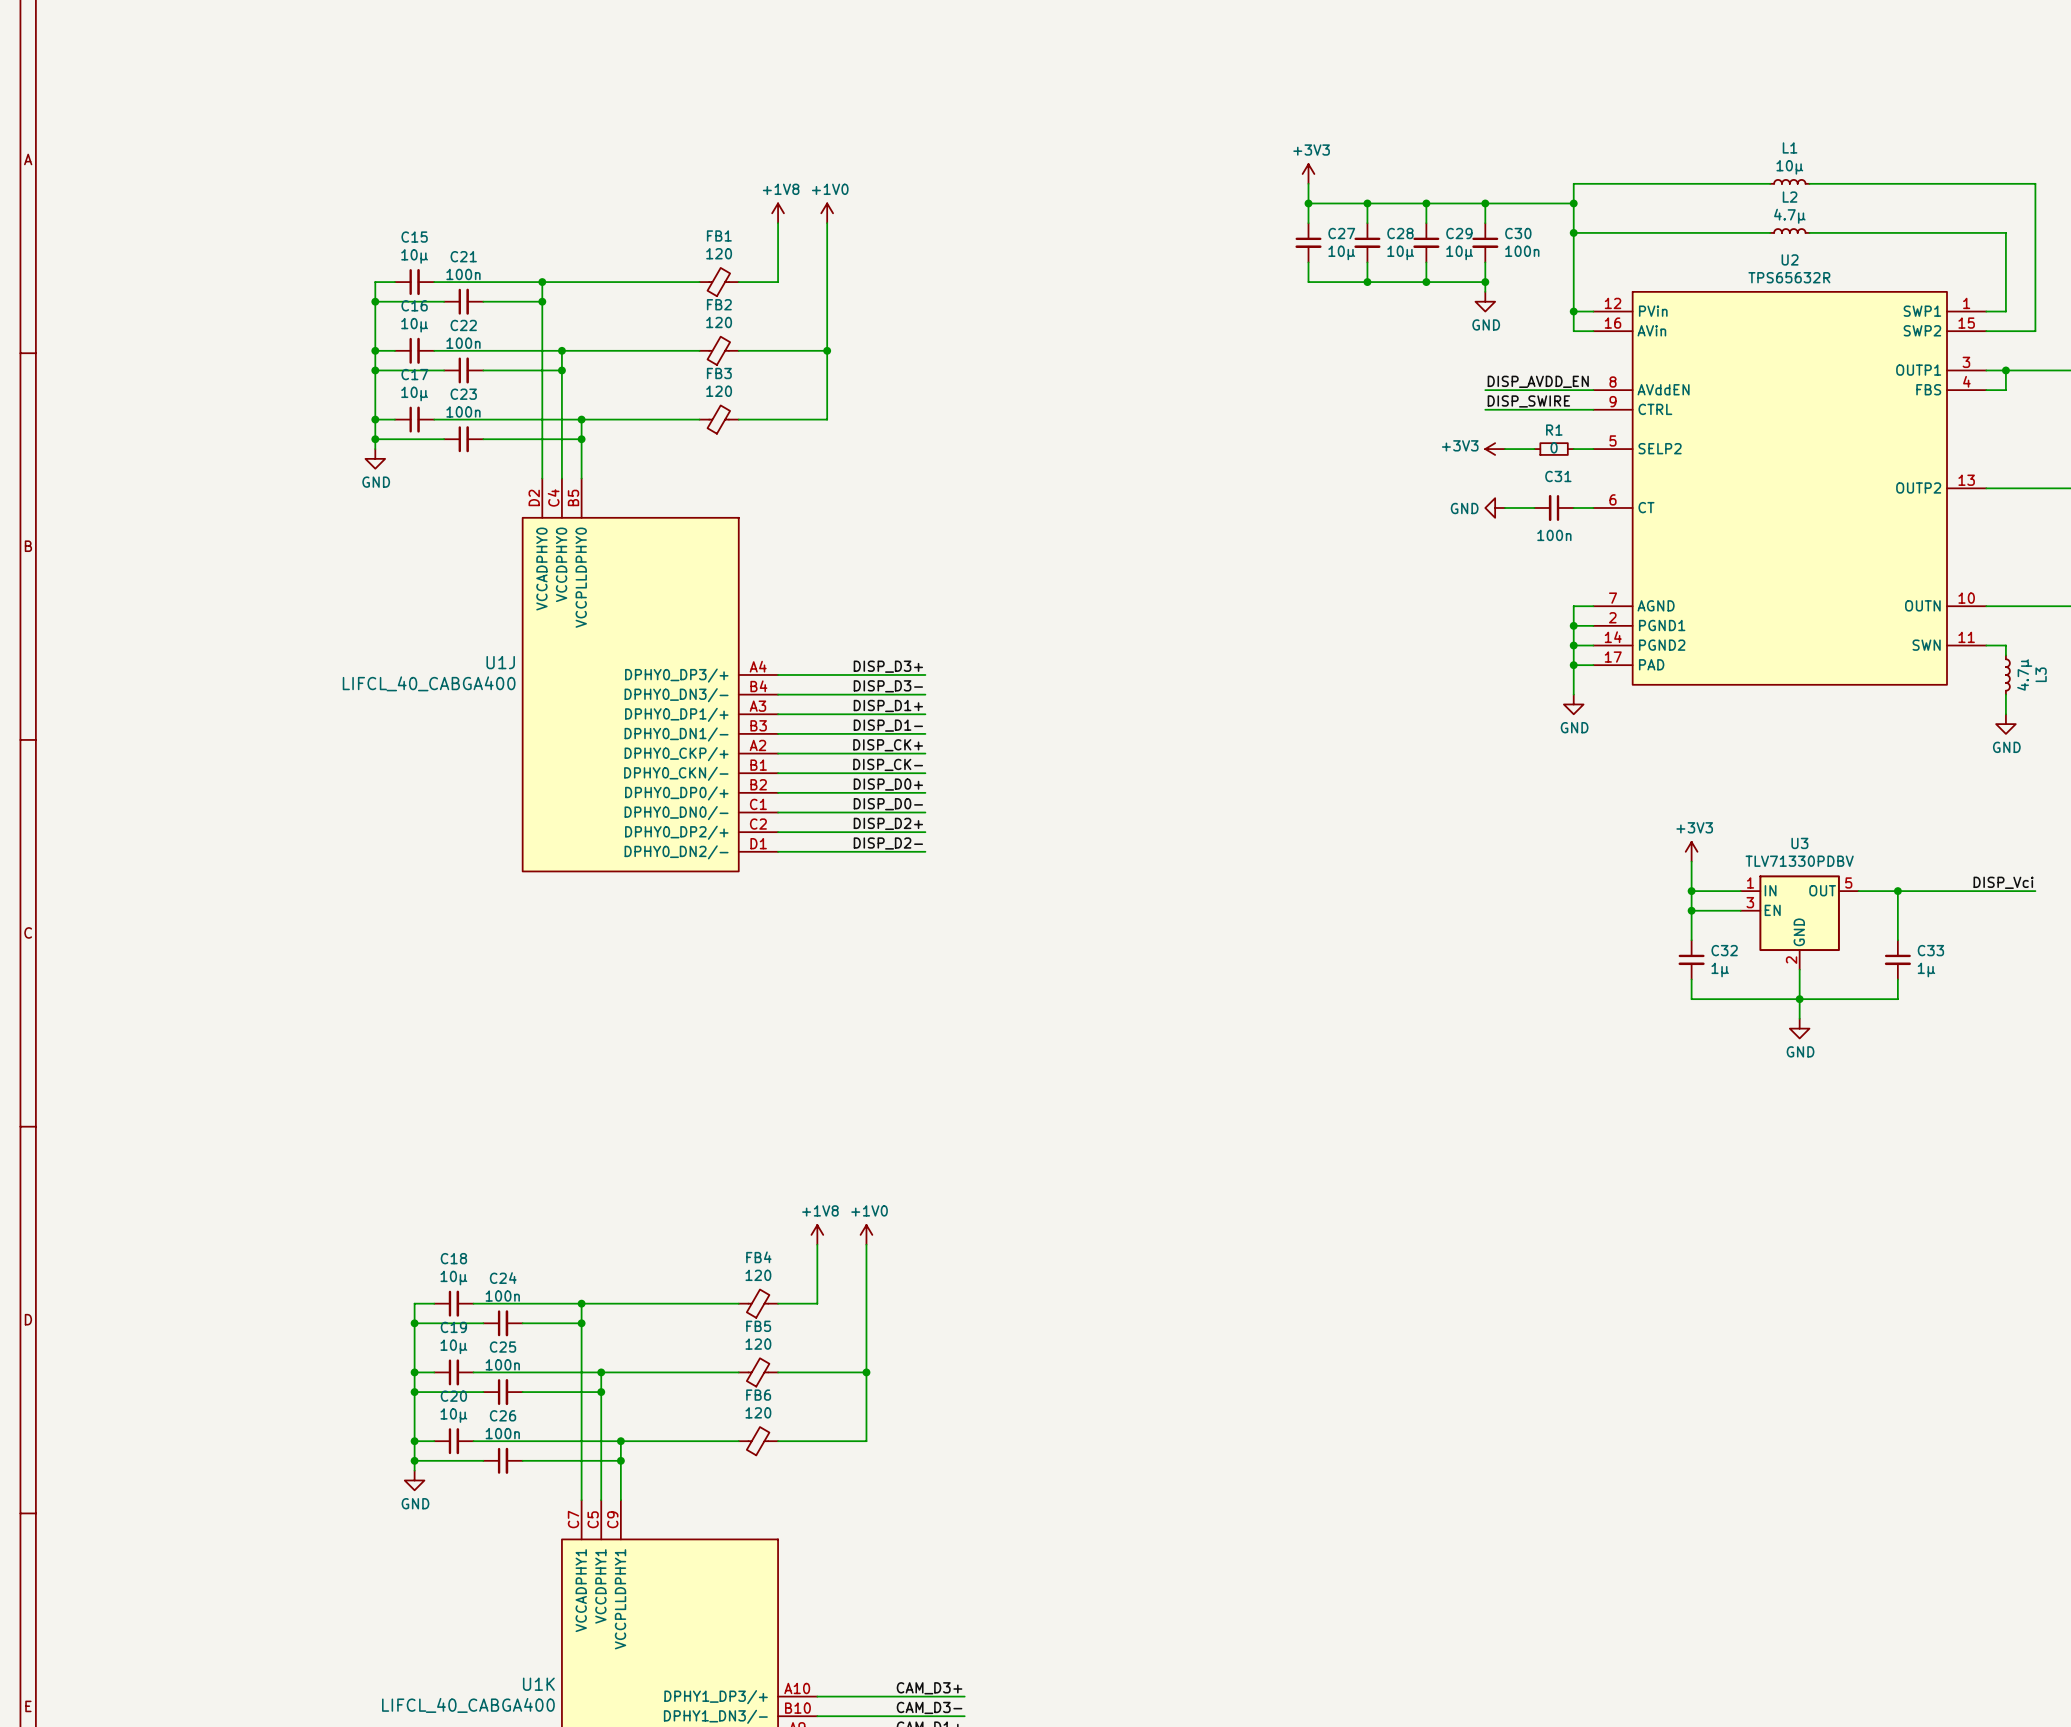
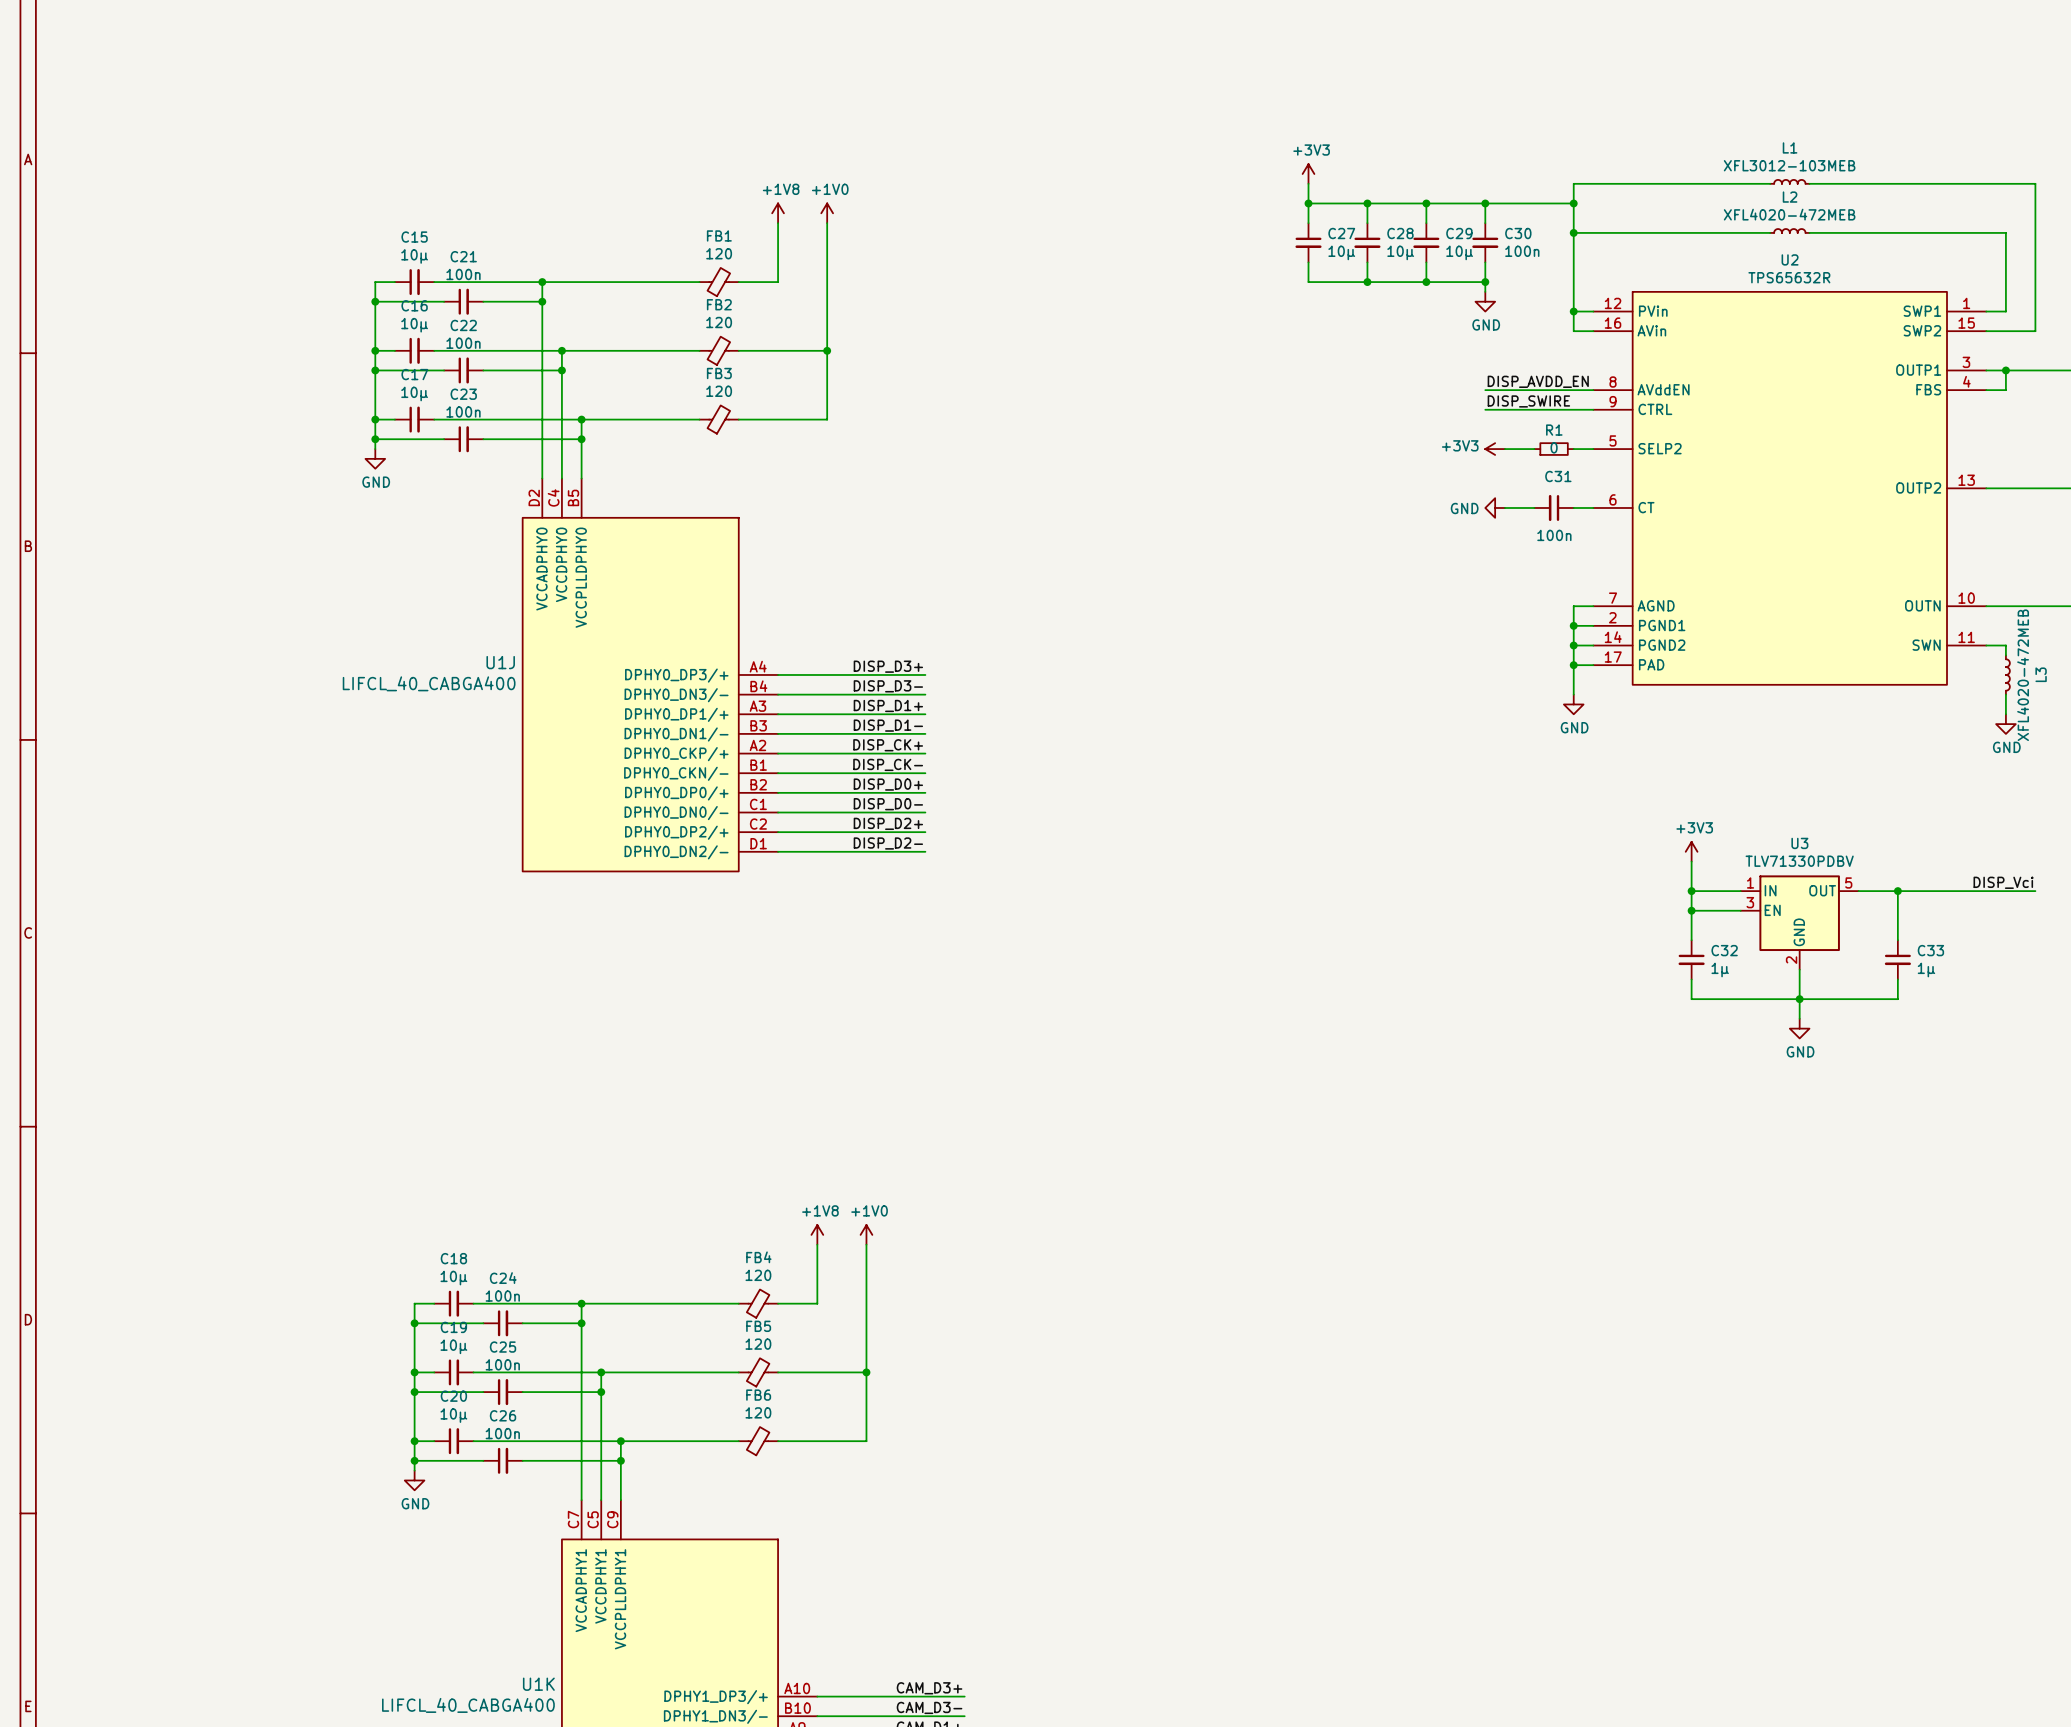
L1 value: 10µ (1789, 167) -> XFL3012-103MEB (1789, 165)
L2 value: 4.7µ (1789, 216) -> XFL4020-472MEB (1789, 214)
L3 value: 4.7µ (2024, 674) -> XFL4020-472MEB (2023, 675)

